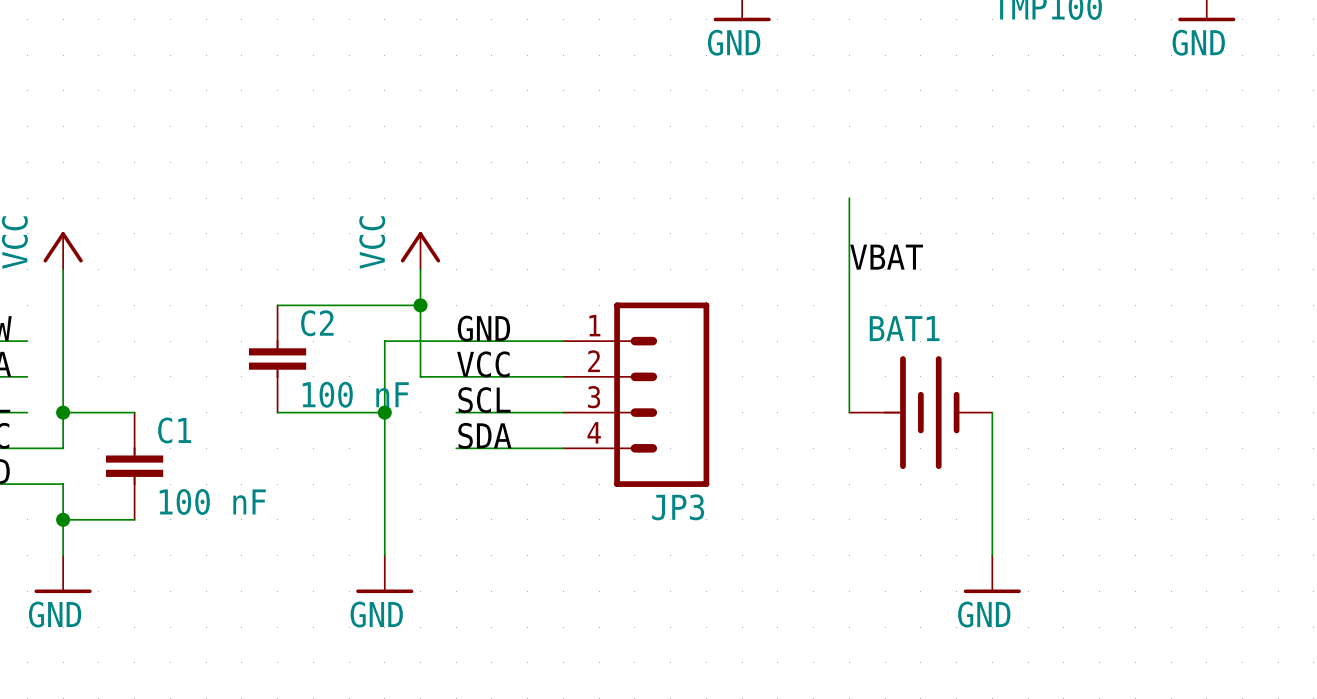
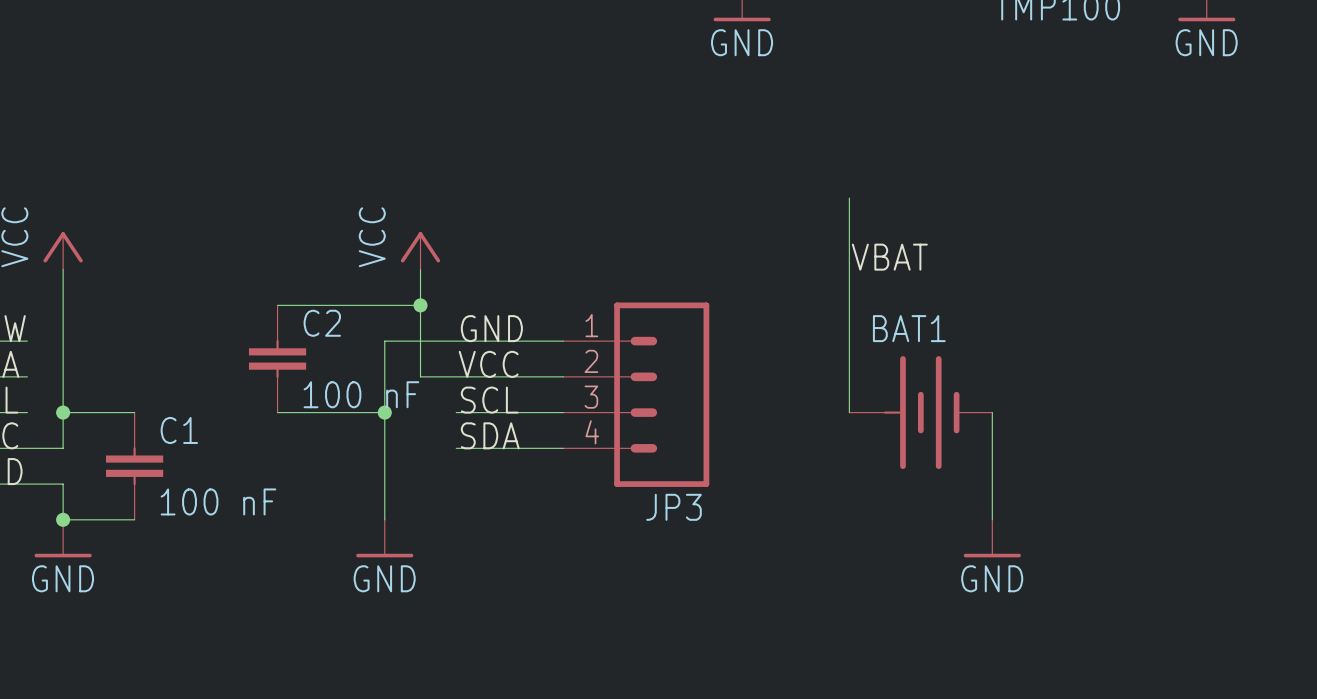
power symbol position: GND (63, 574) -> GND (63, 538)
power symbol position: GND (384, 574) -> GND (384, 538)
power symbol position: GND (992, 574) -> GND (992, 538)

